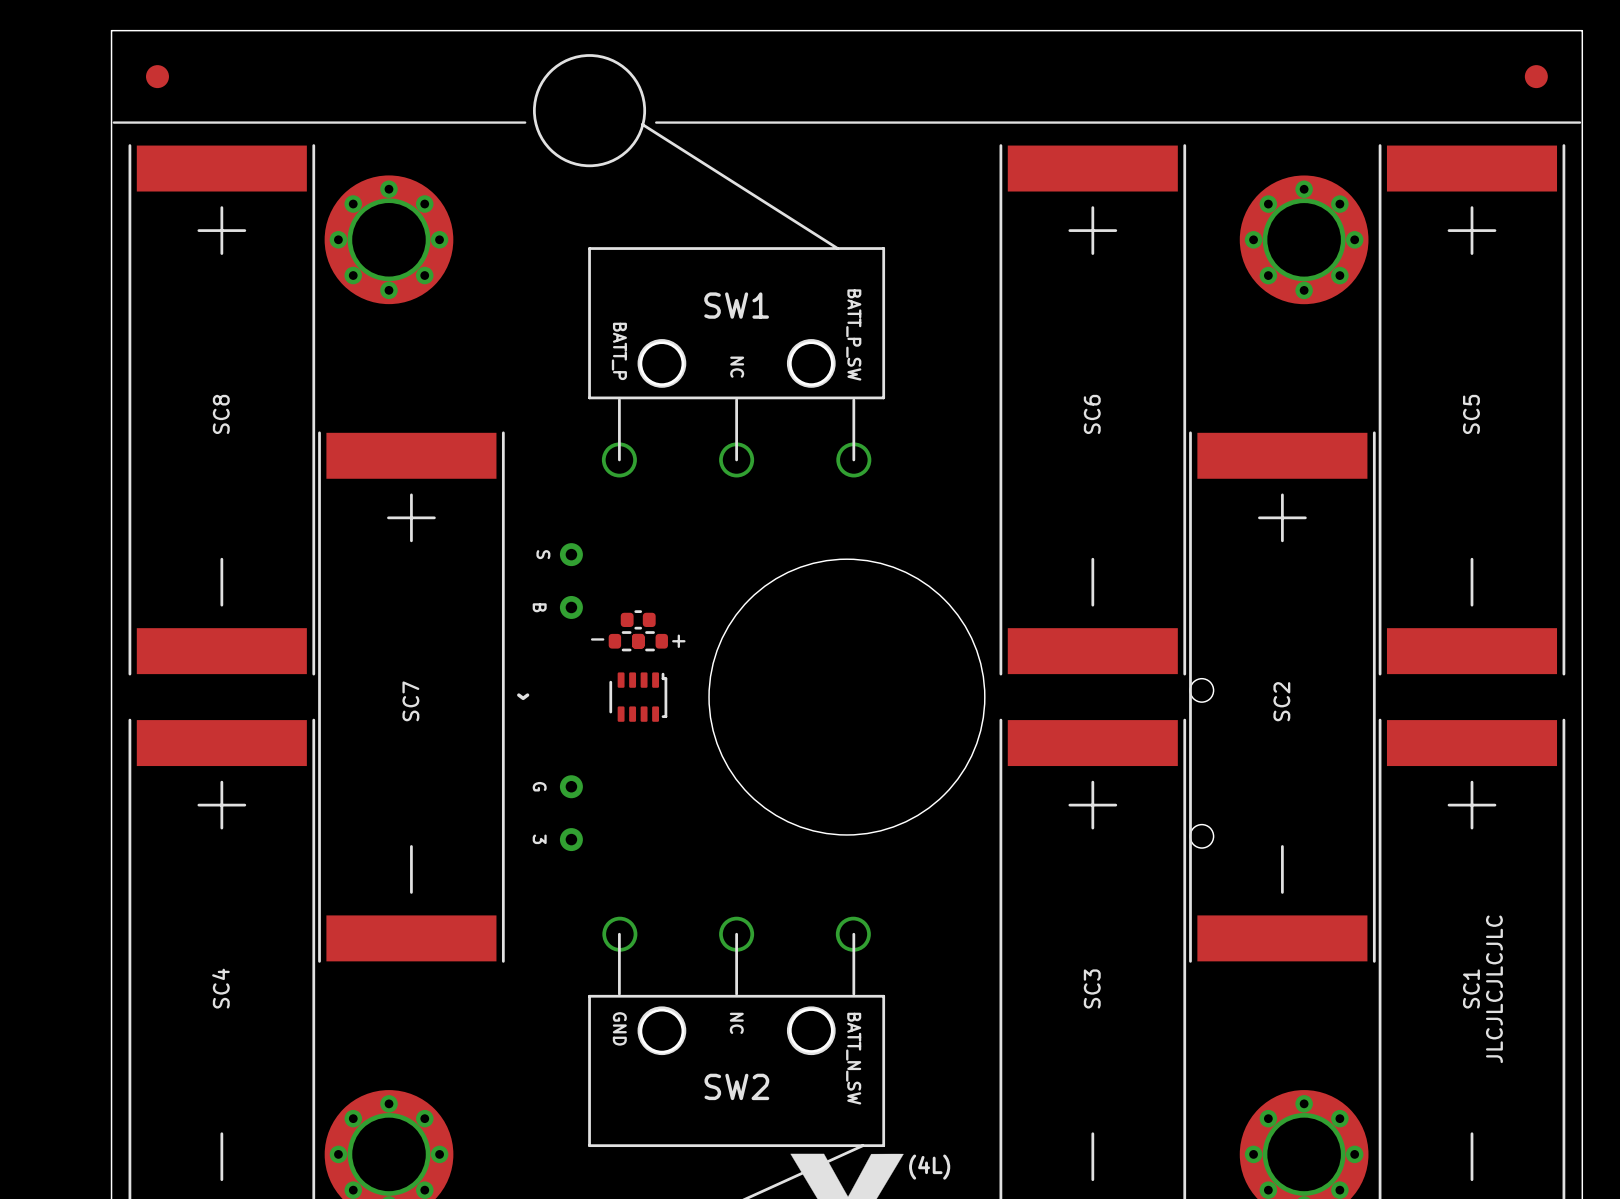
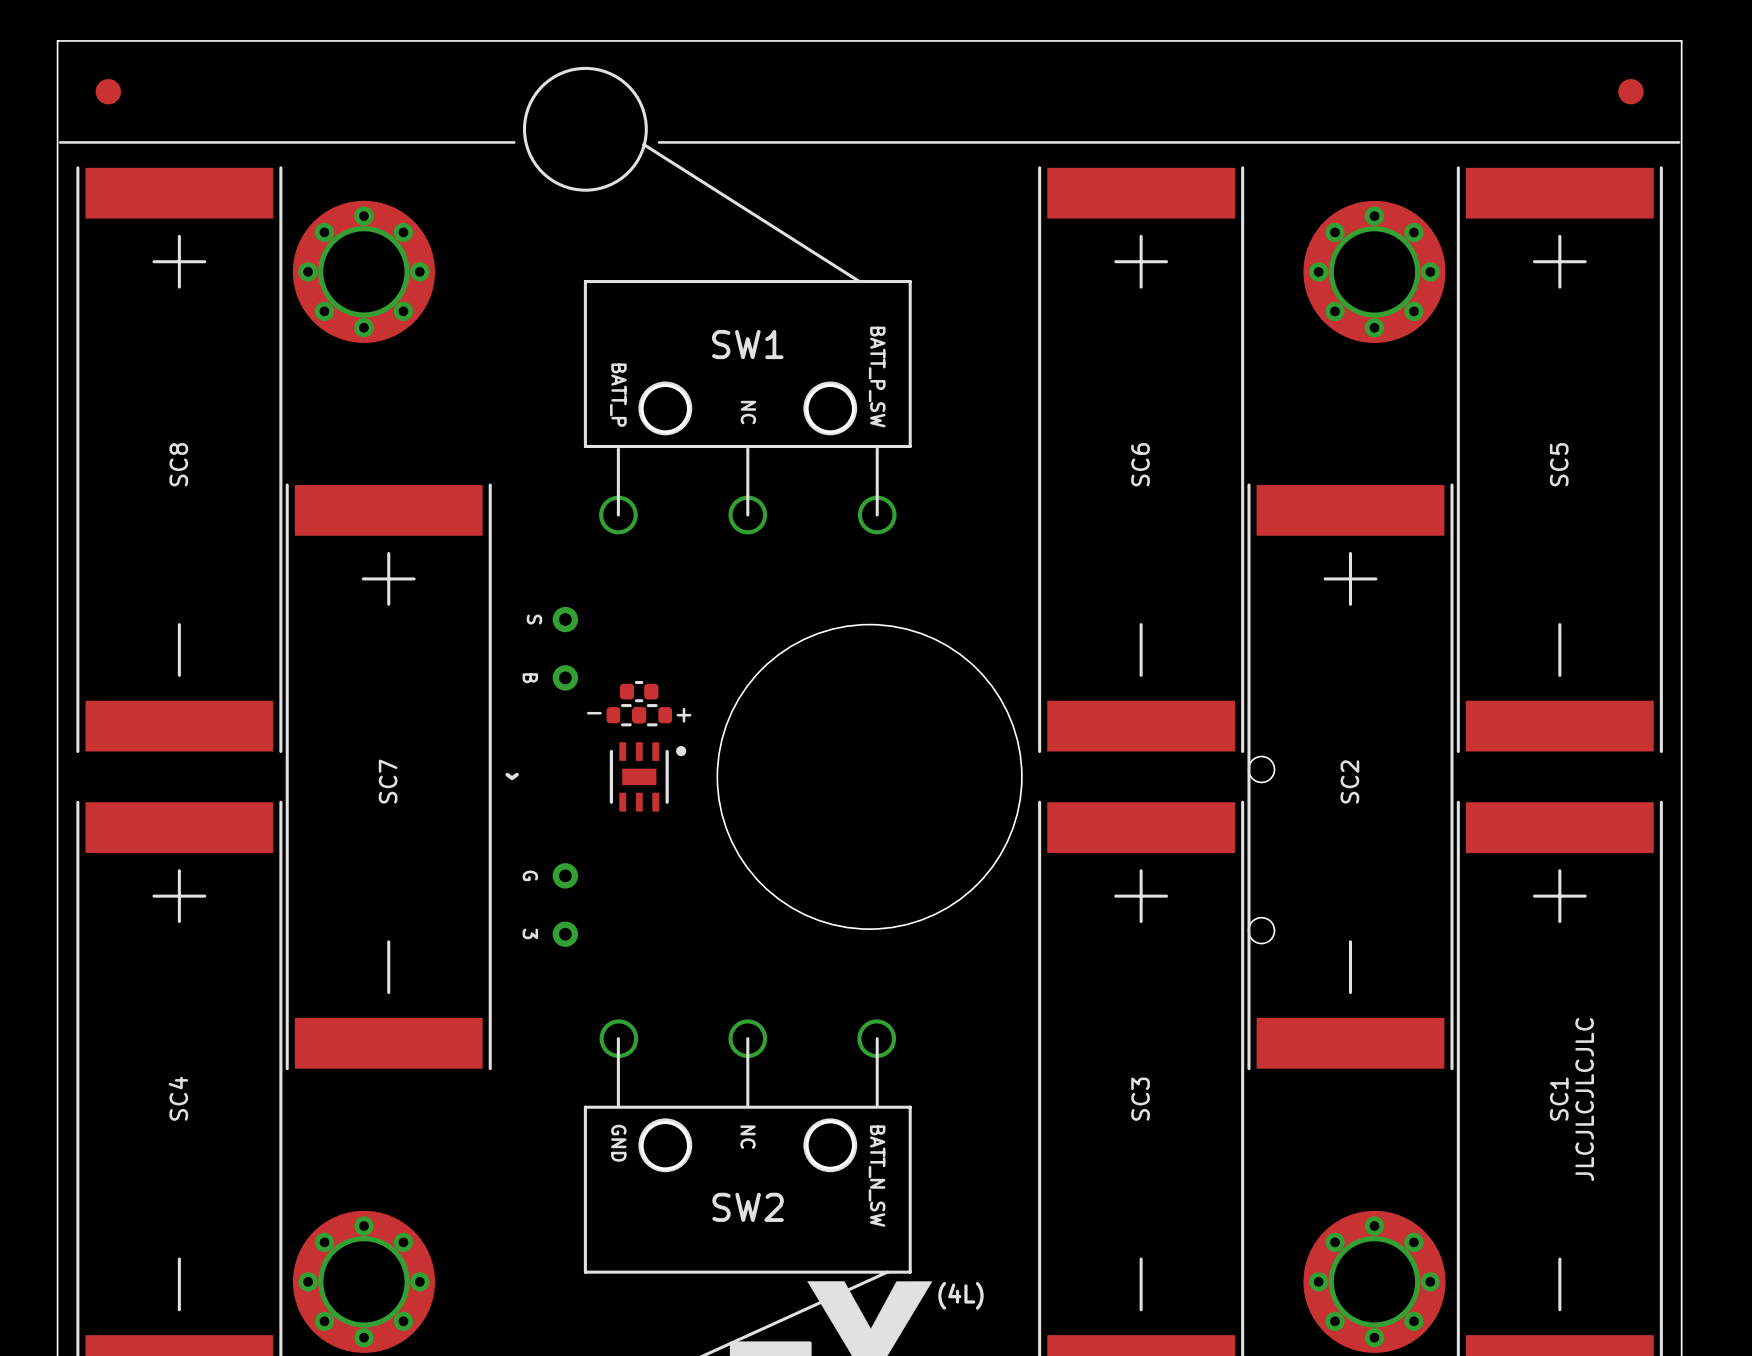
part footprint: [609, 672, 668, 722] -> [609, 742, 687, 812]

